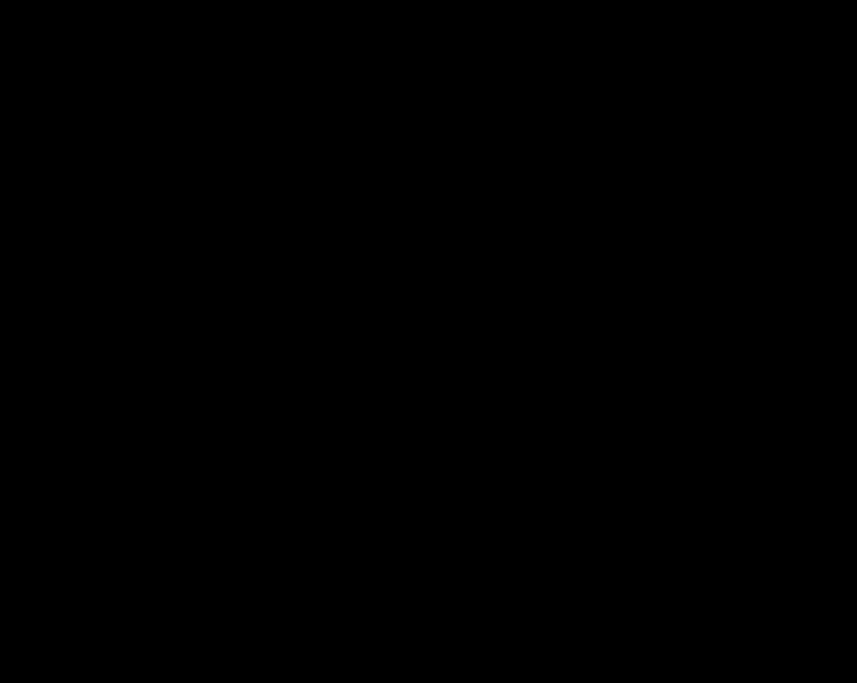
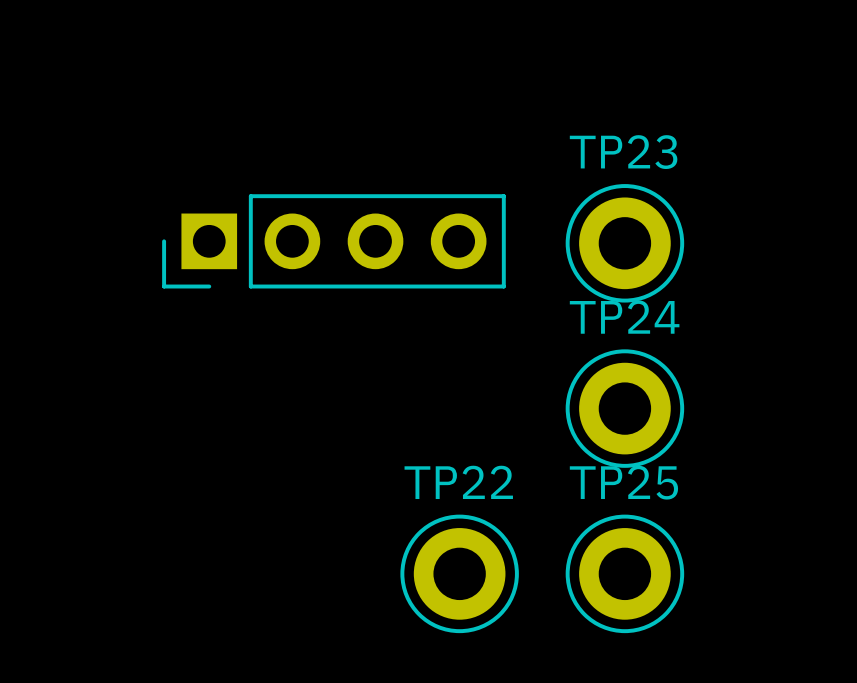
part: none -> (333, 241)
TP23: none -> (624, 243)
TP24: none -> (624, 408)
TP22: none -> (459, 573)
TP25: none -> (624, 573)

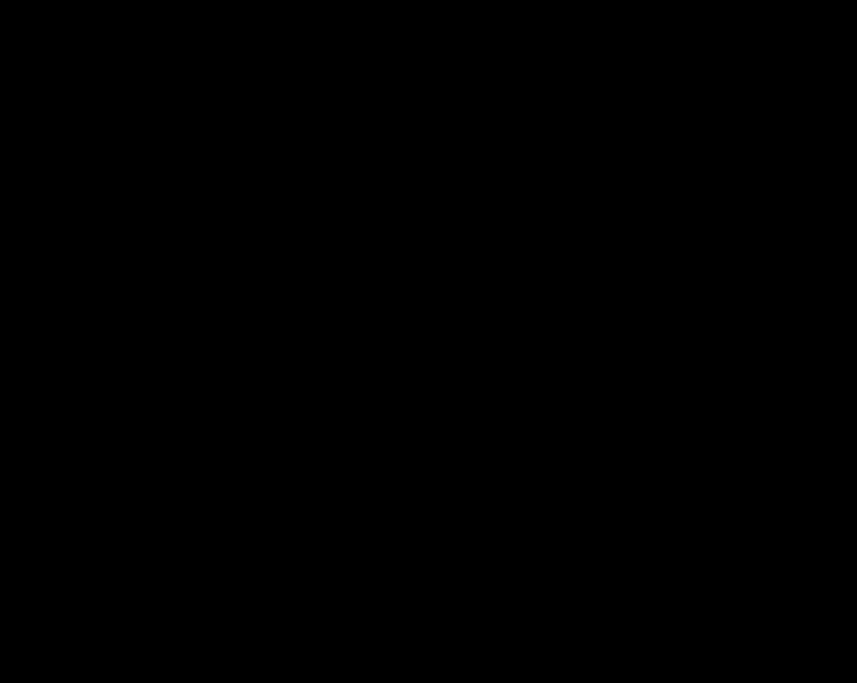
part: (333, 241) -> none
TP23: (624, 243) -> none
TP24: (624, 408) -> none
TP22: (459, 573) -> none
TP25: (624, 573) -> none

